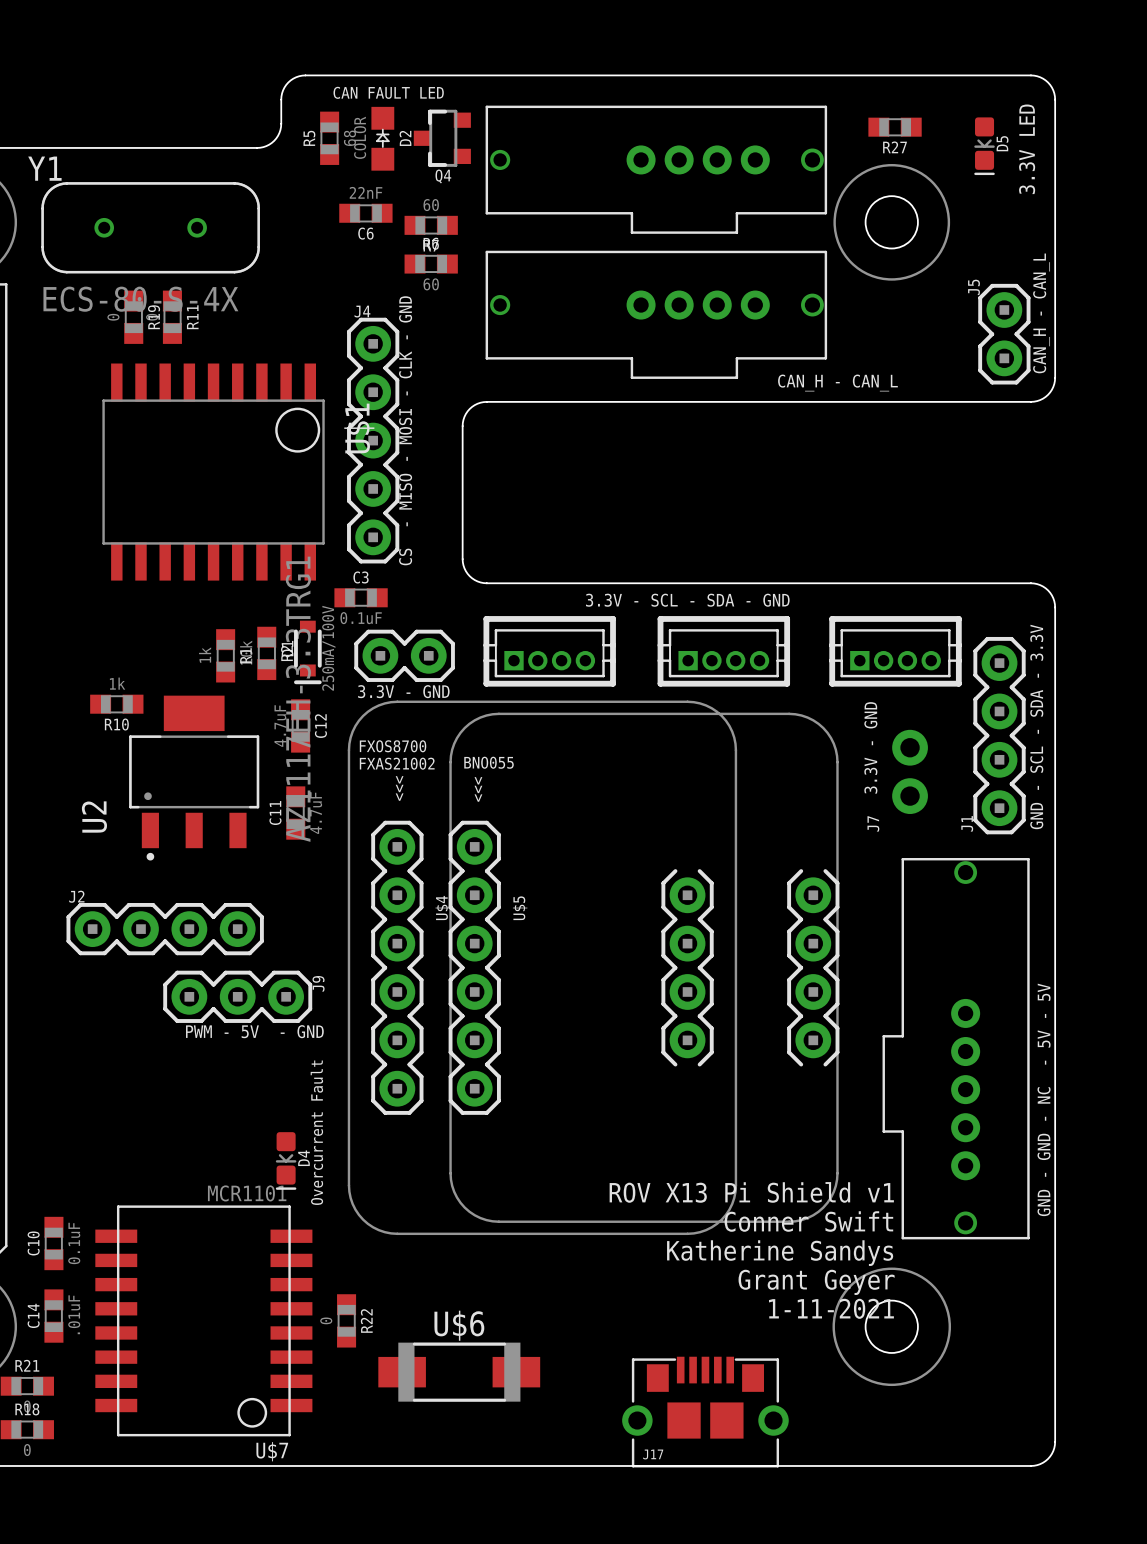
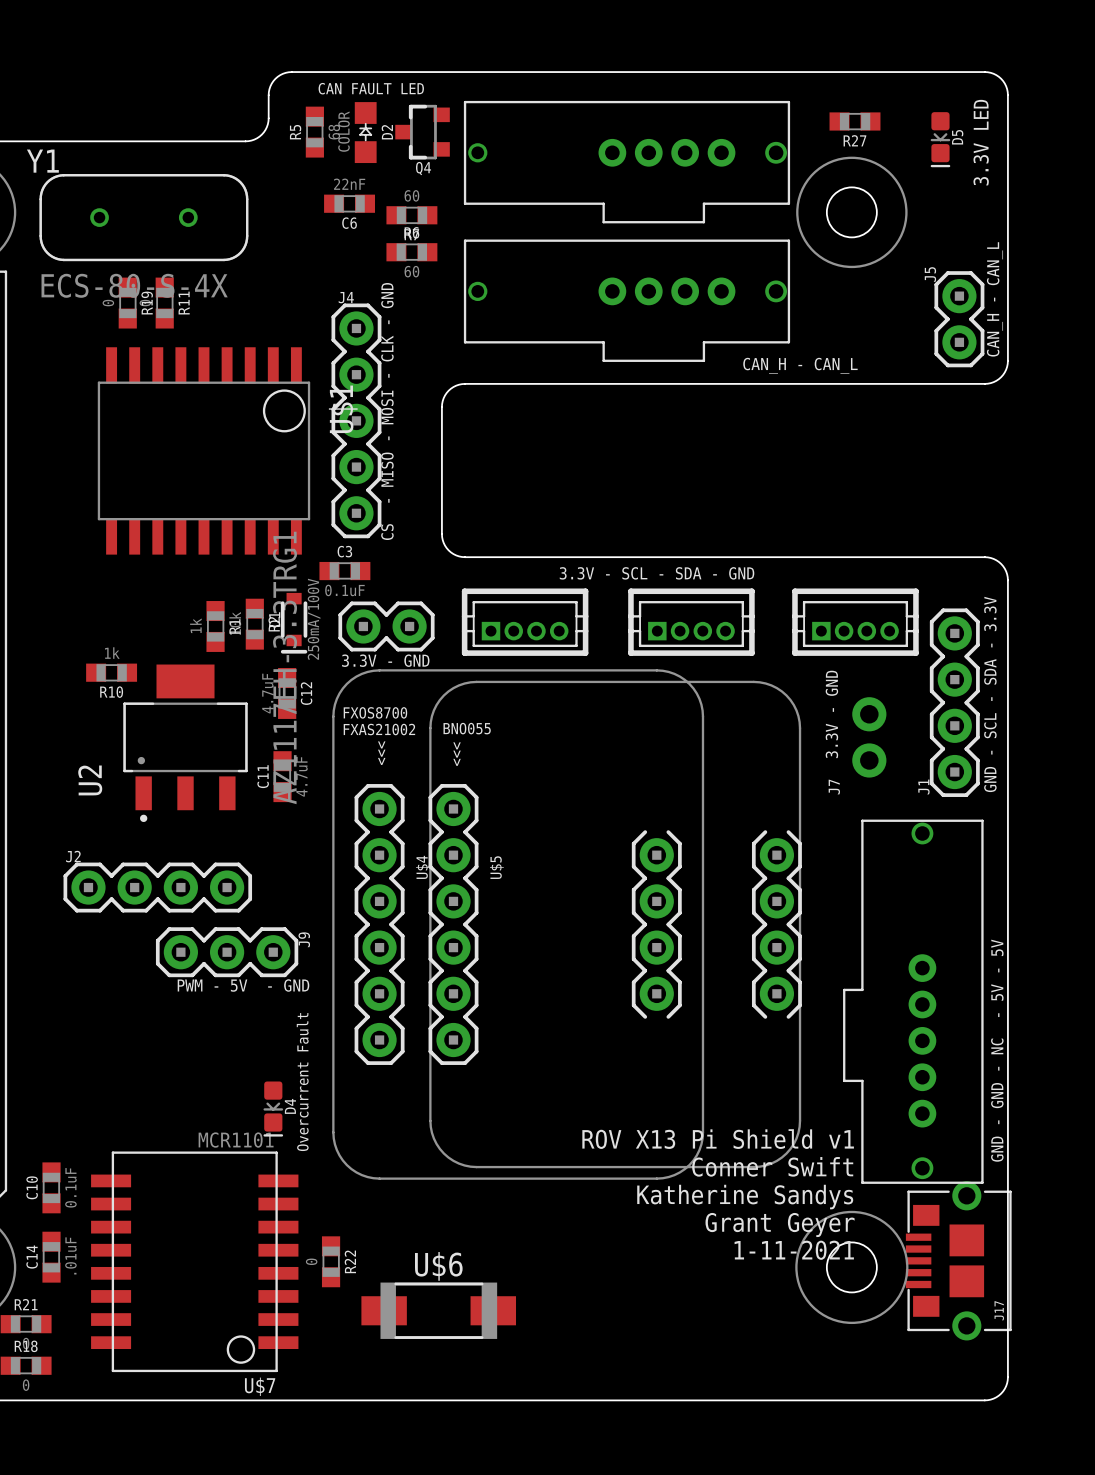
J17 rotation: 0° (705, 1412) -> 90° counterclockwise (958, 1260)
J17 position: (705, 1412) -> (958, 1260)

